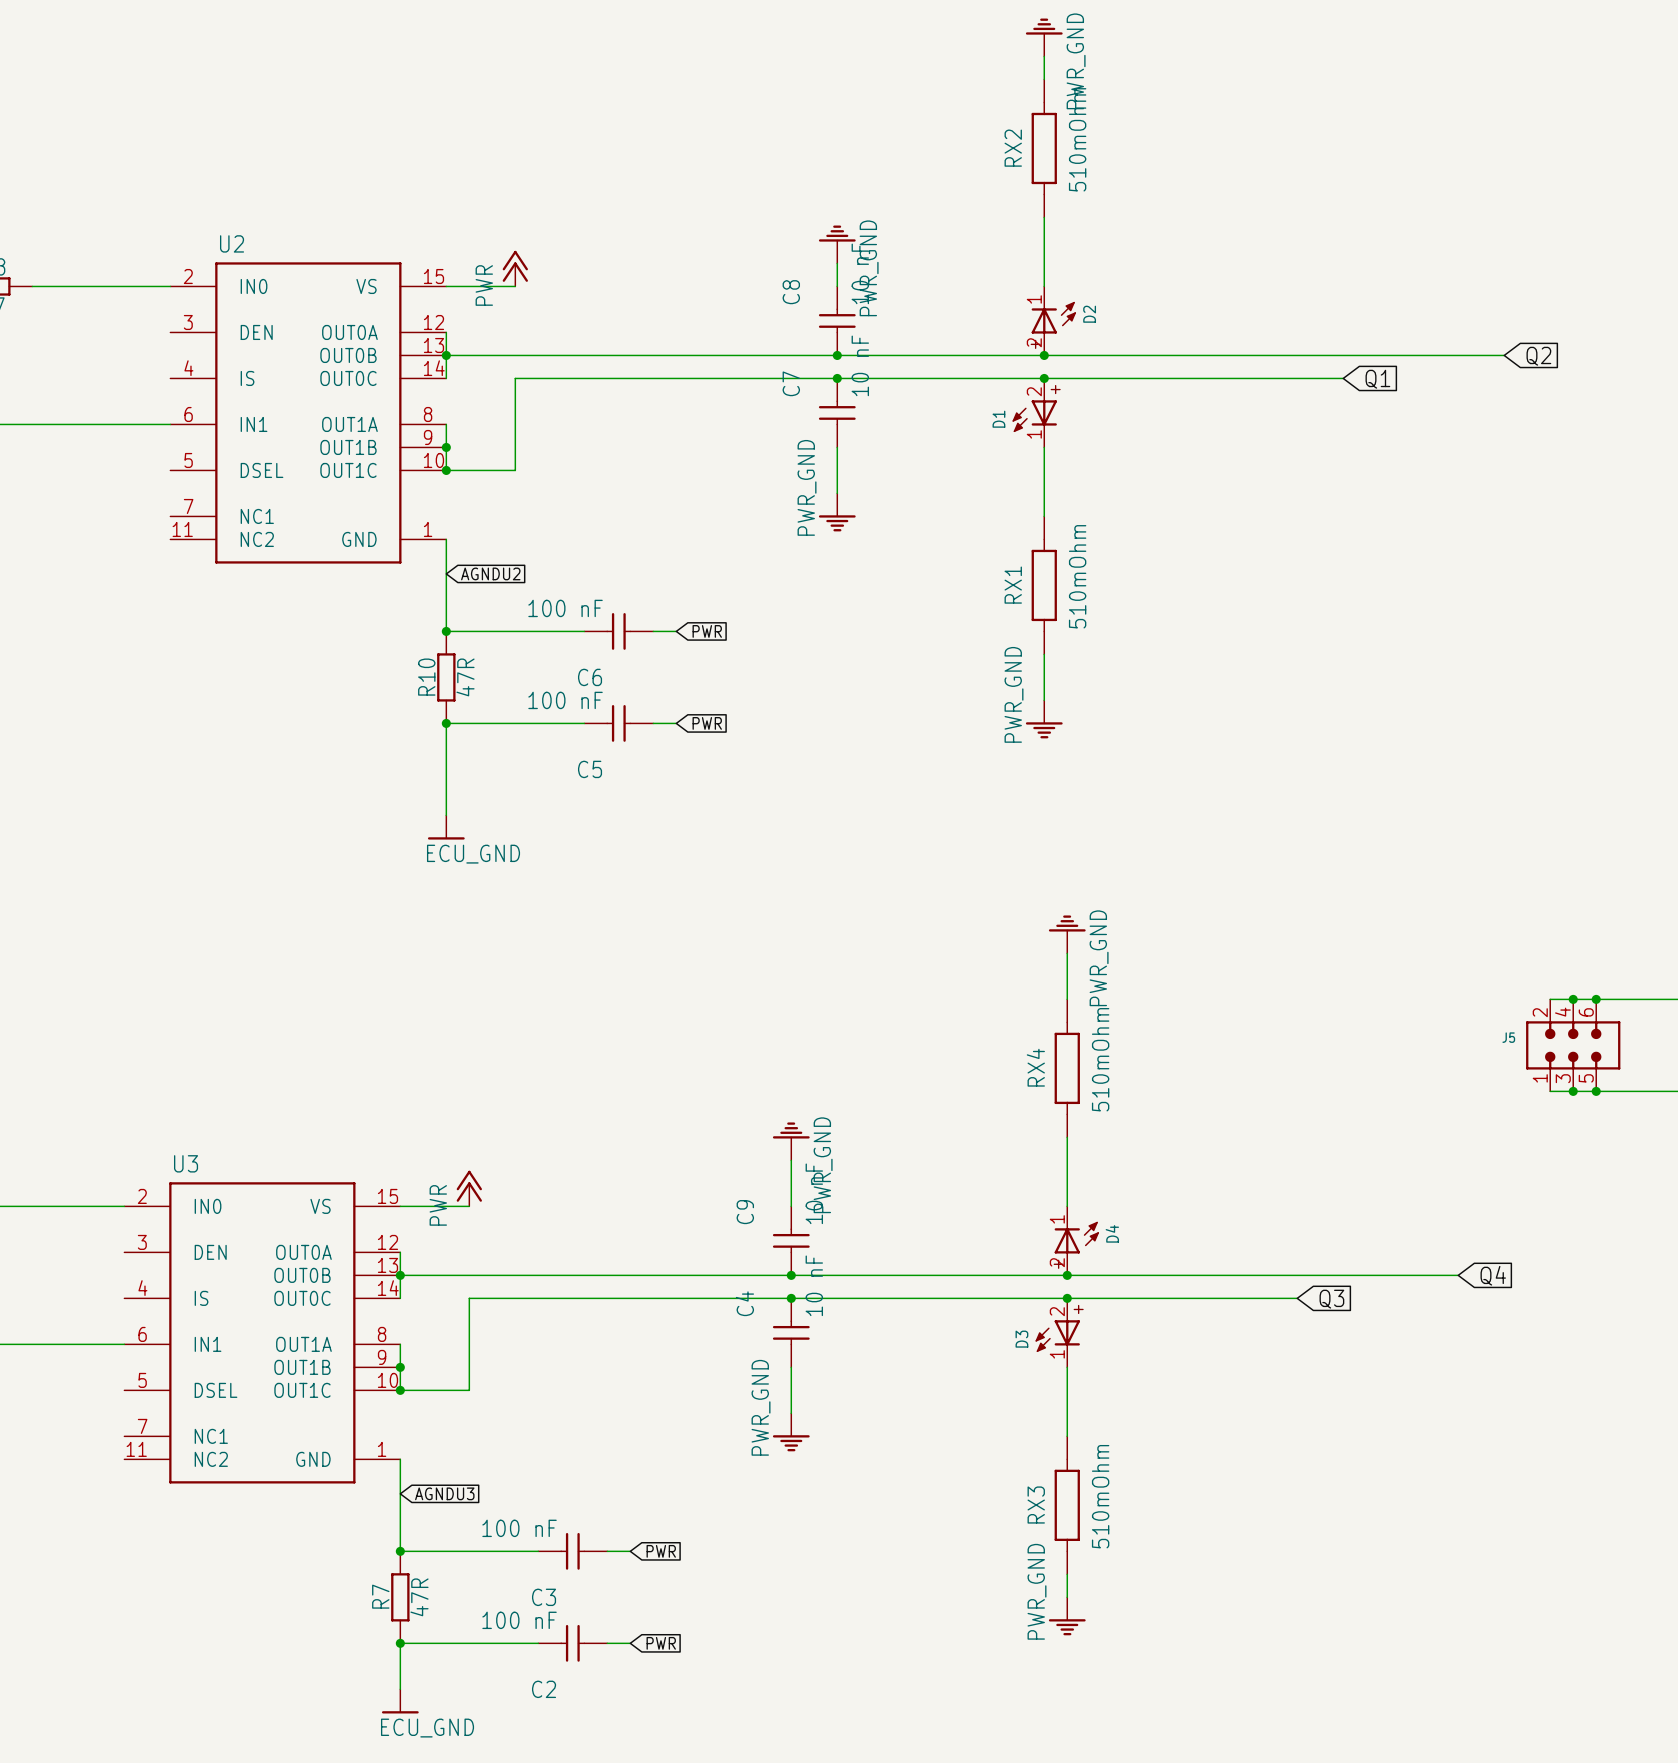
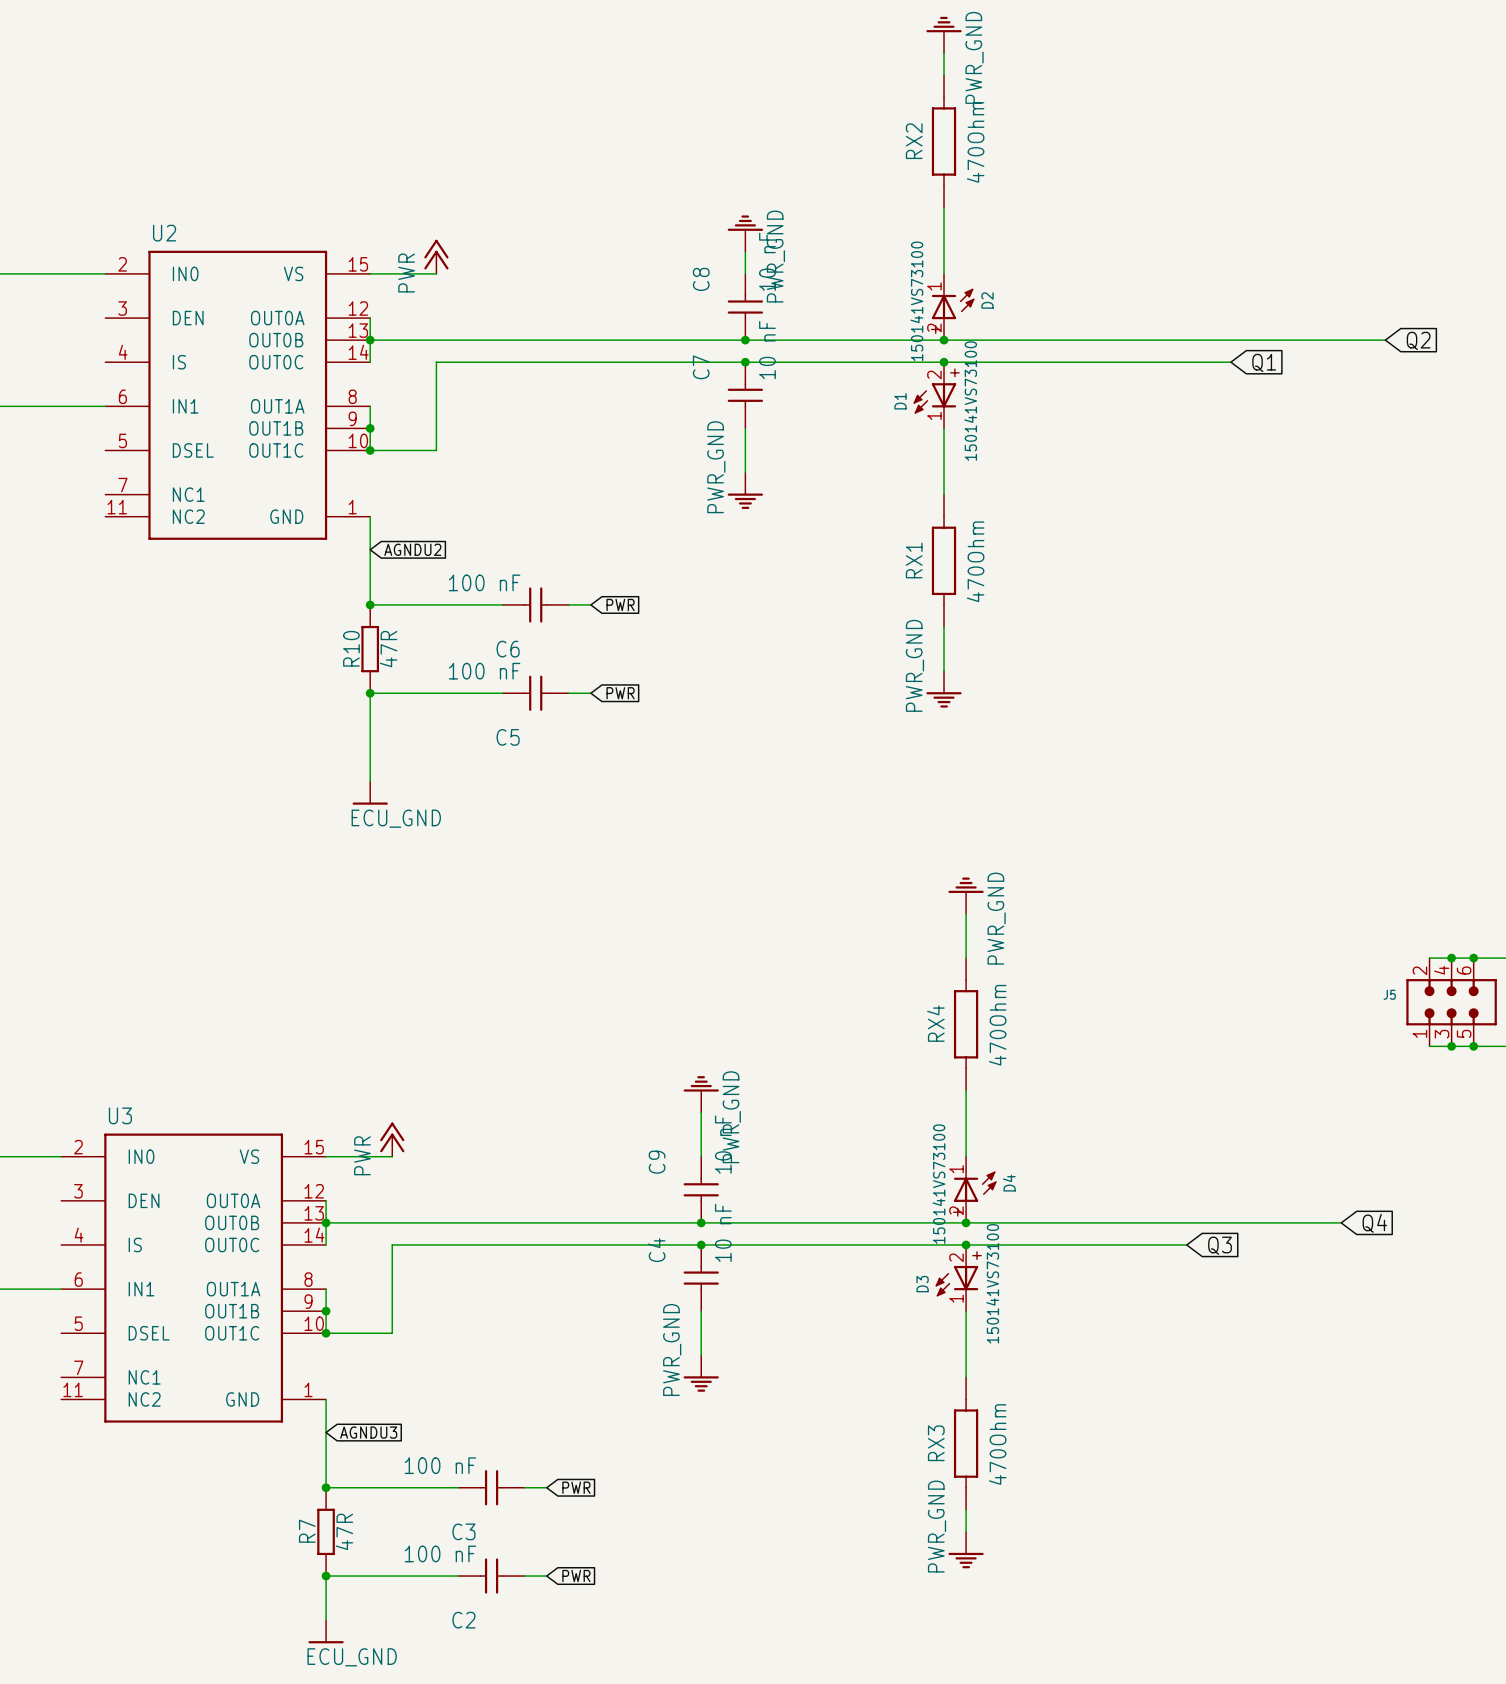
RX2 value: 510mOhm (1077, 139) -> 470Ohm (975, 142)
D2 value: none -> 150141VS73100 (916, 301)
D1 value: none -> 150141VS73100 (970, 401)
RX1 value: 510mOhm (1077, 576) -> 470Ohm (975, 561)
RX4 value: 510mOhm (1100, 1059) -> 470Ohm (997, 1025)
D4 value: none -> 150141VS73100 (938, 1184)
D3 value: none -> 150141VS73100 (992, 1283)
RX3 value: 510mOhm (1100, 1496) -> 470Ohm (997, 1444)

